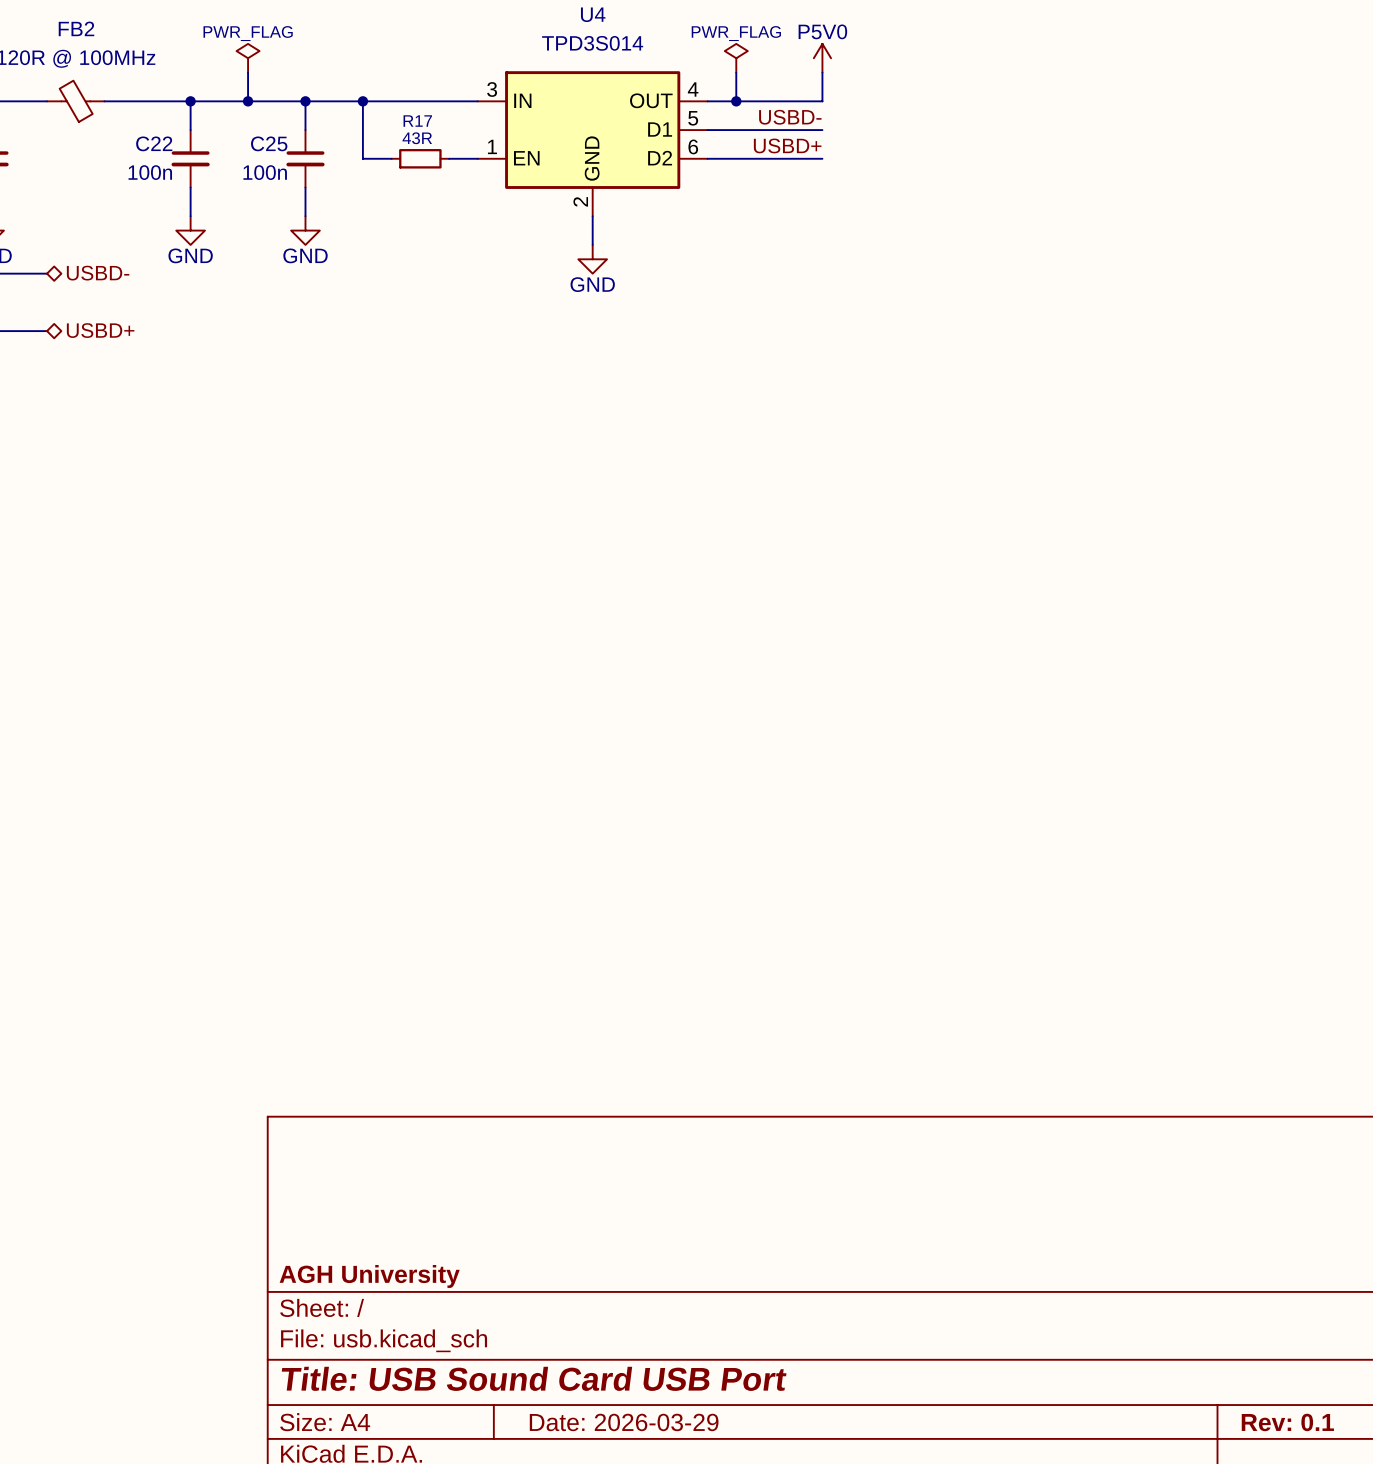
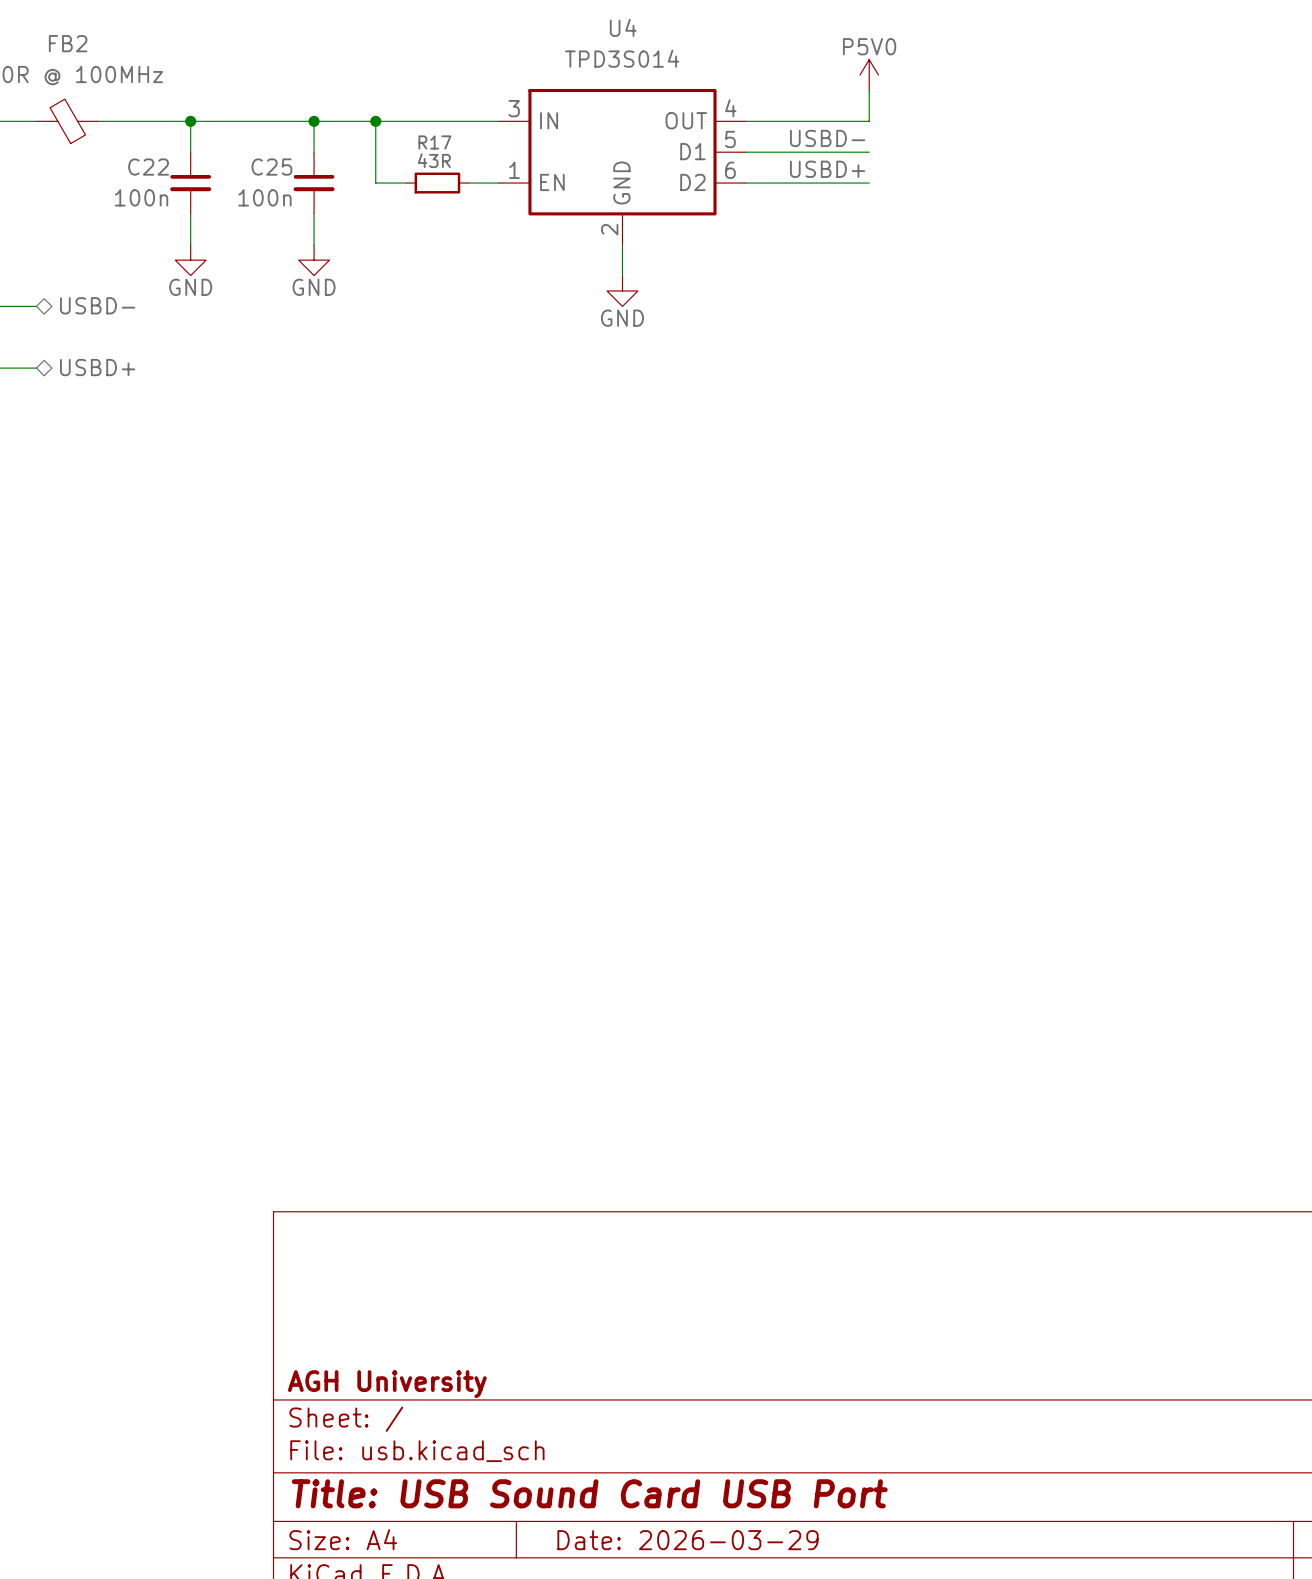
power symbol: PWR_FLAG (248, 58) -> none
power symbol: PWR_FLAG (736, 58) -> none
wire: (248, 72) (248, 101) -> none
wire: (736, 72) (736, 101) -> none
junction: (248, 101) -> none
junction: (736, 101) -> none

